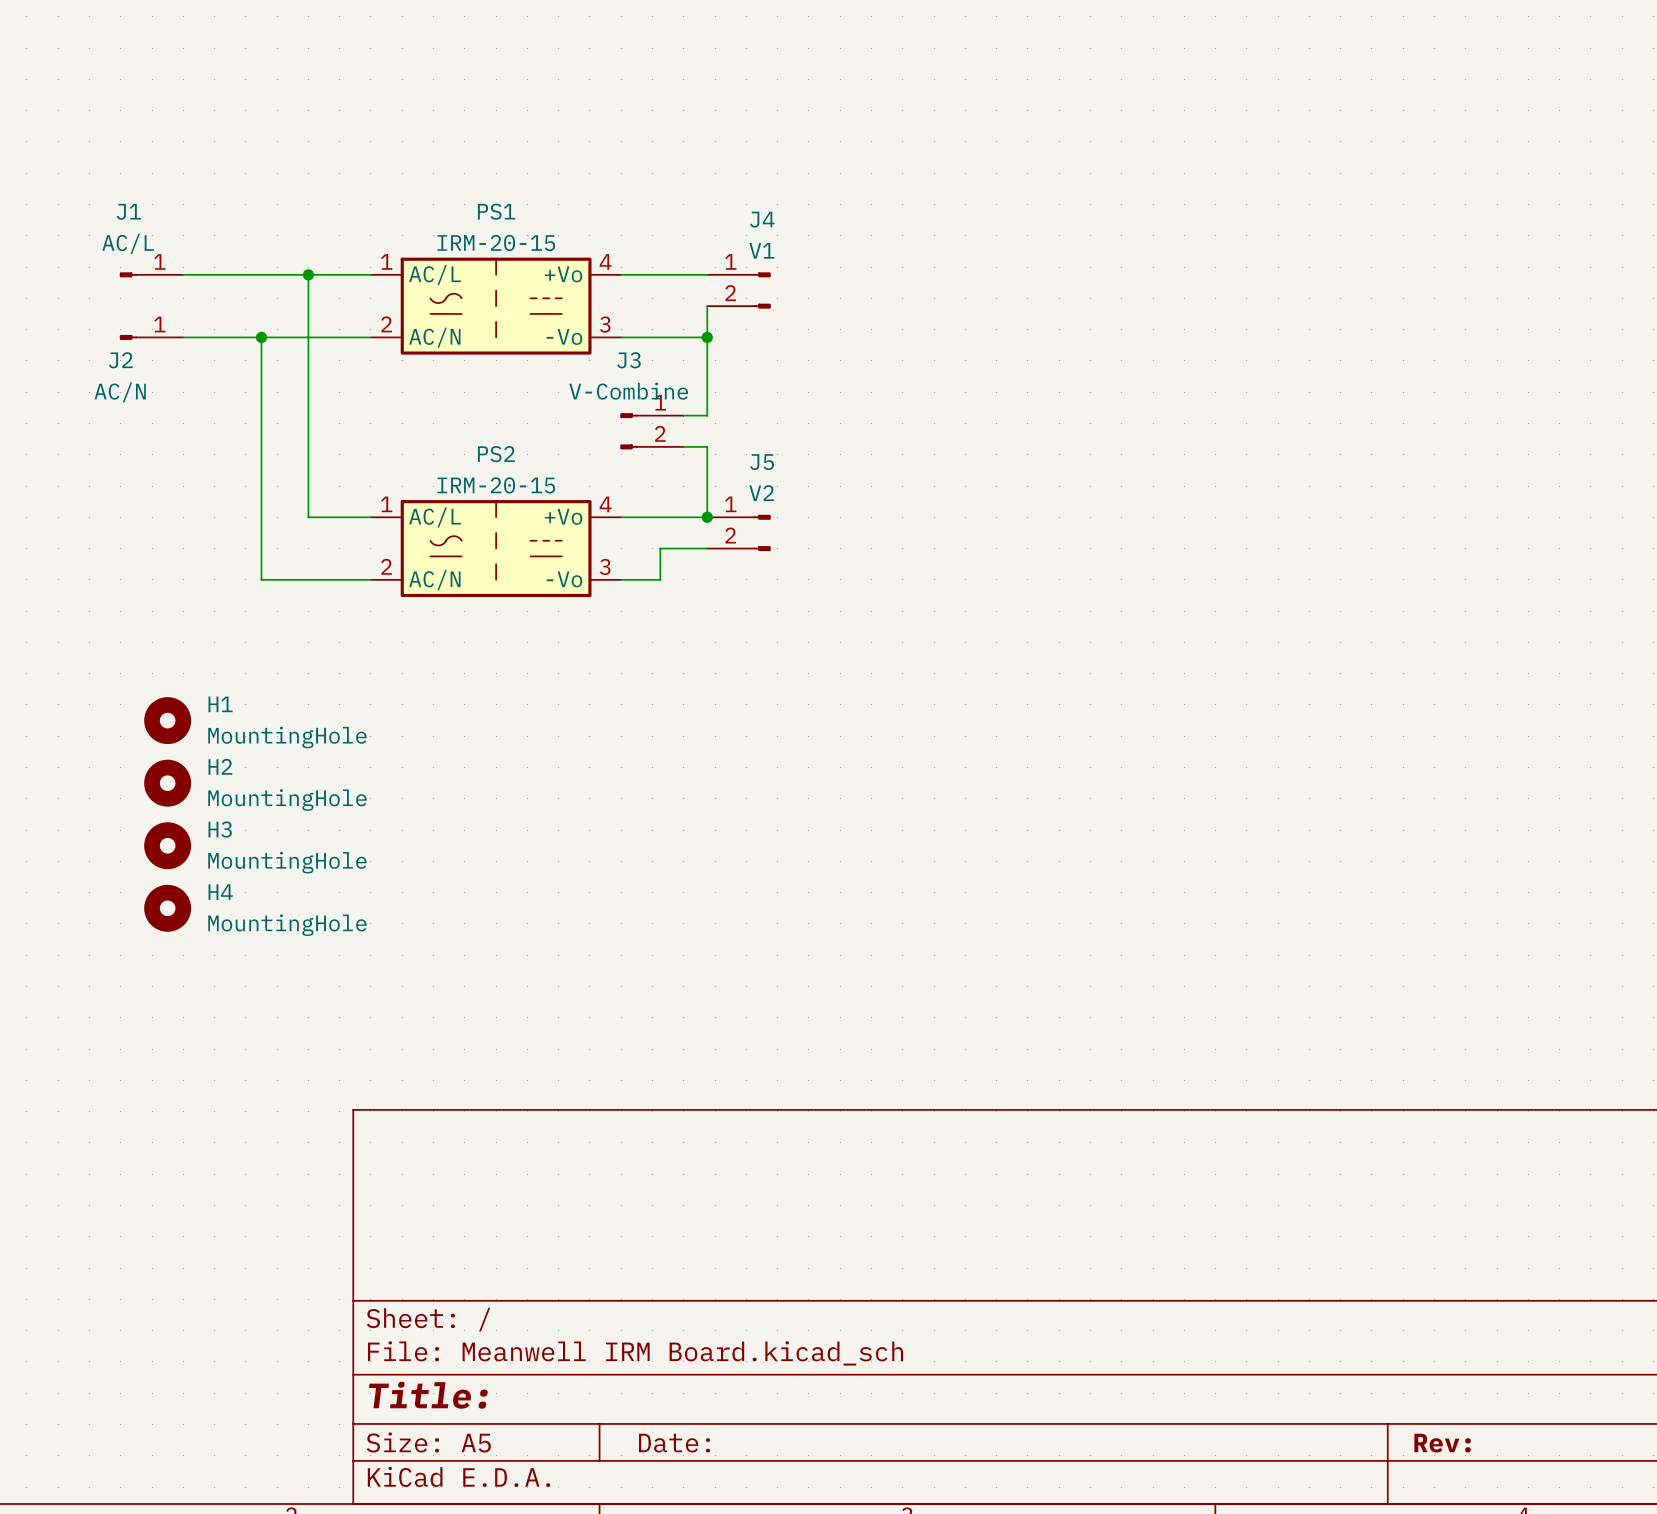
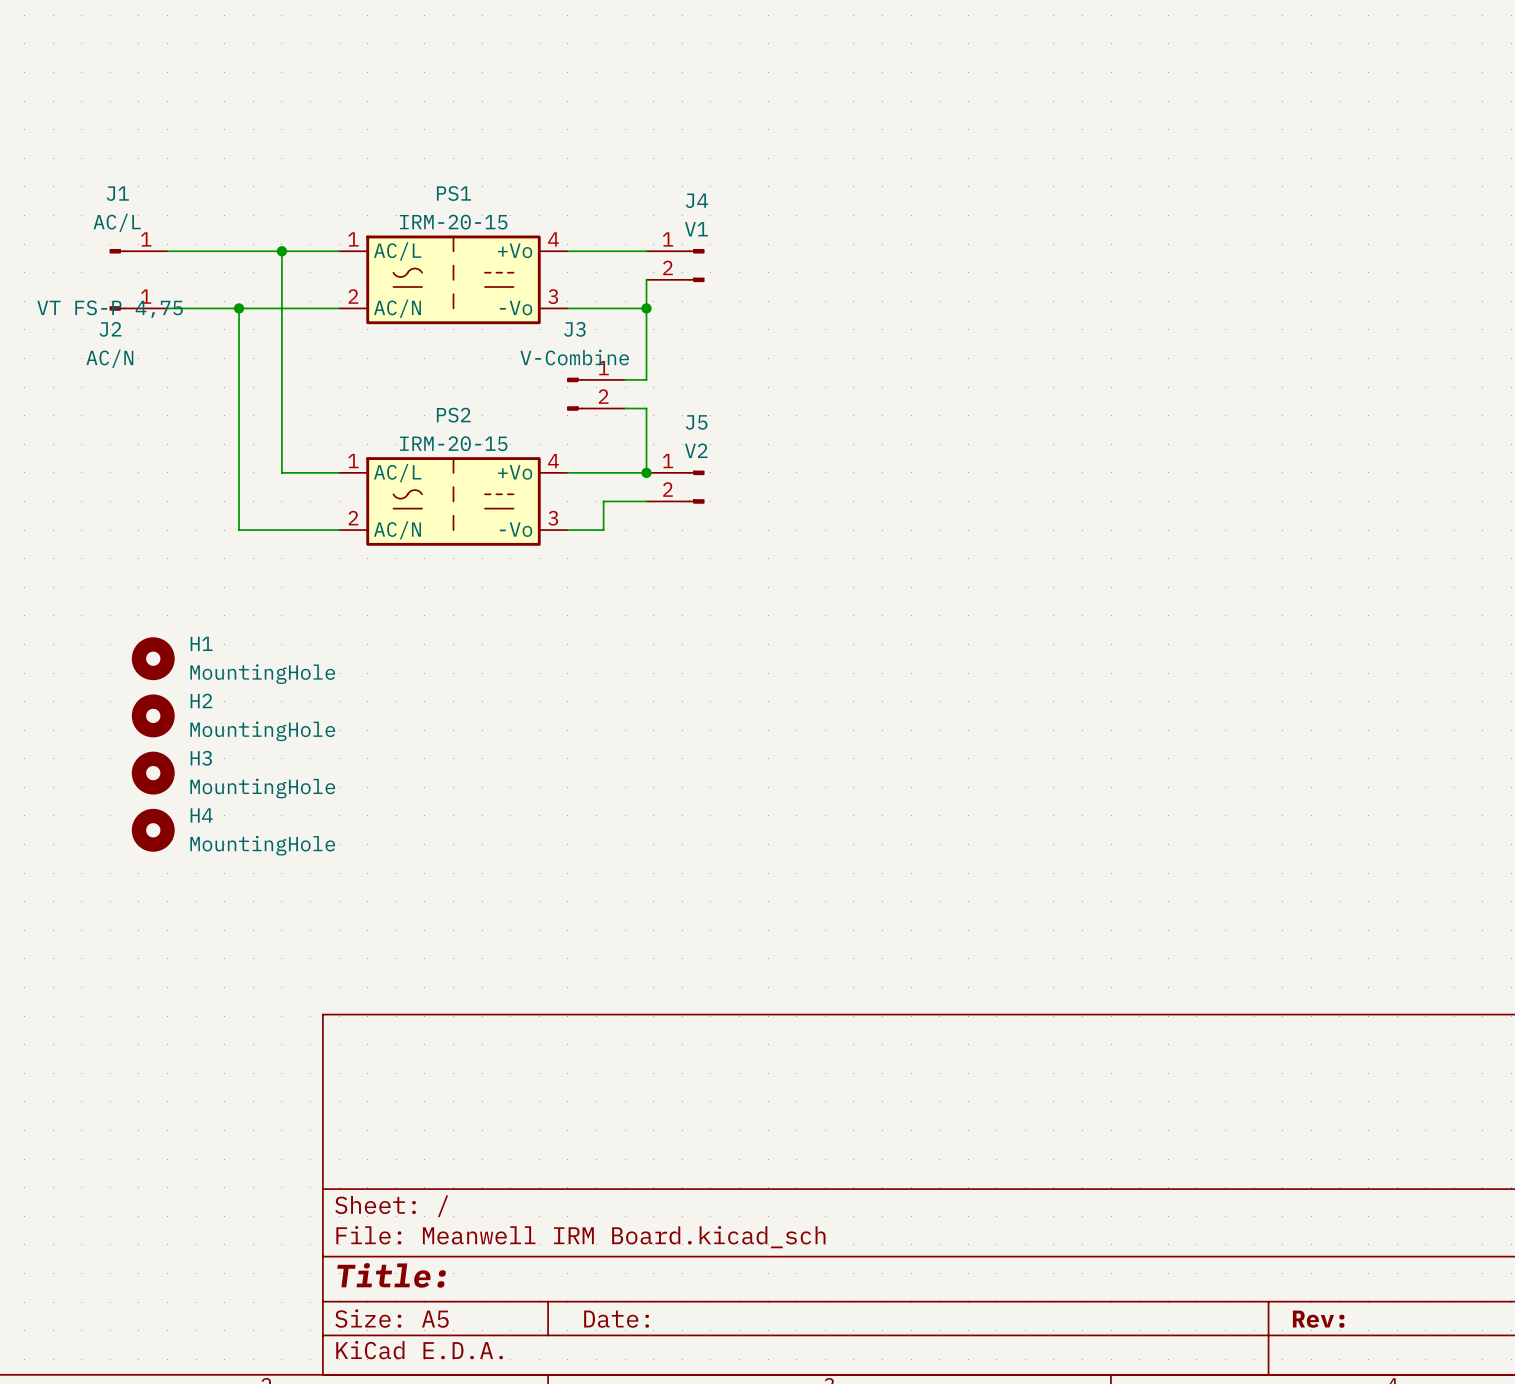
J2 text: none -> VT FS-P 4,75 (110, 309)

